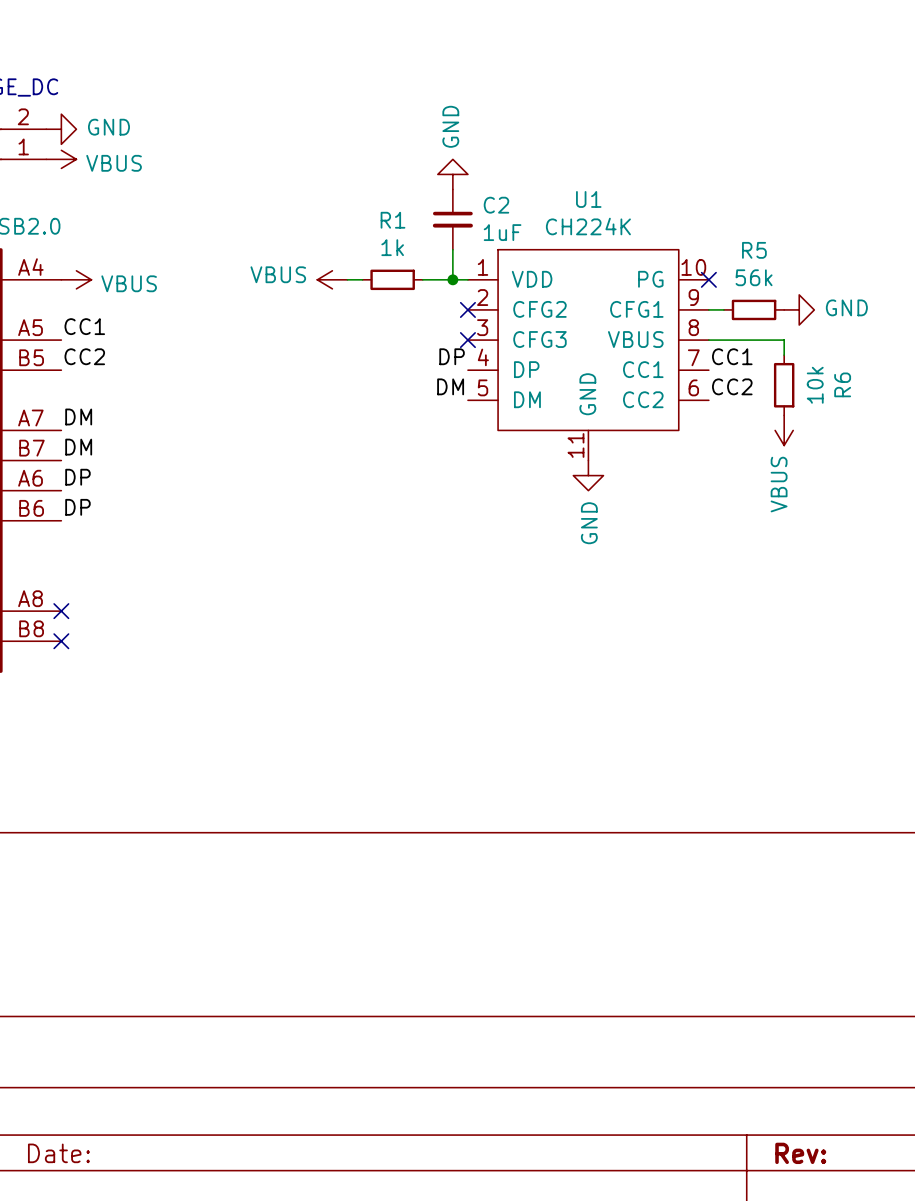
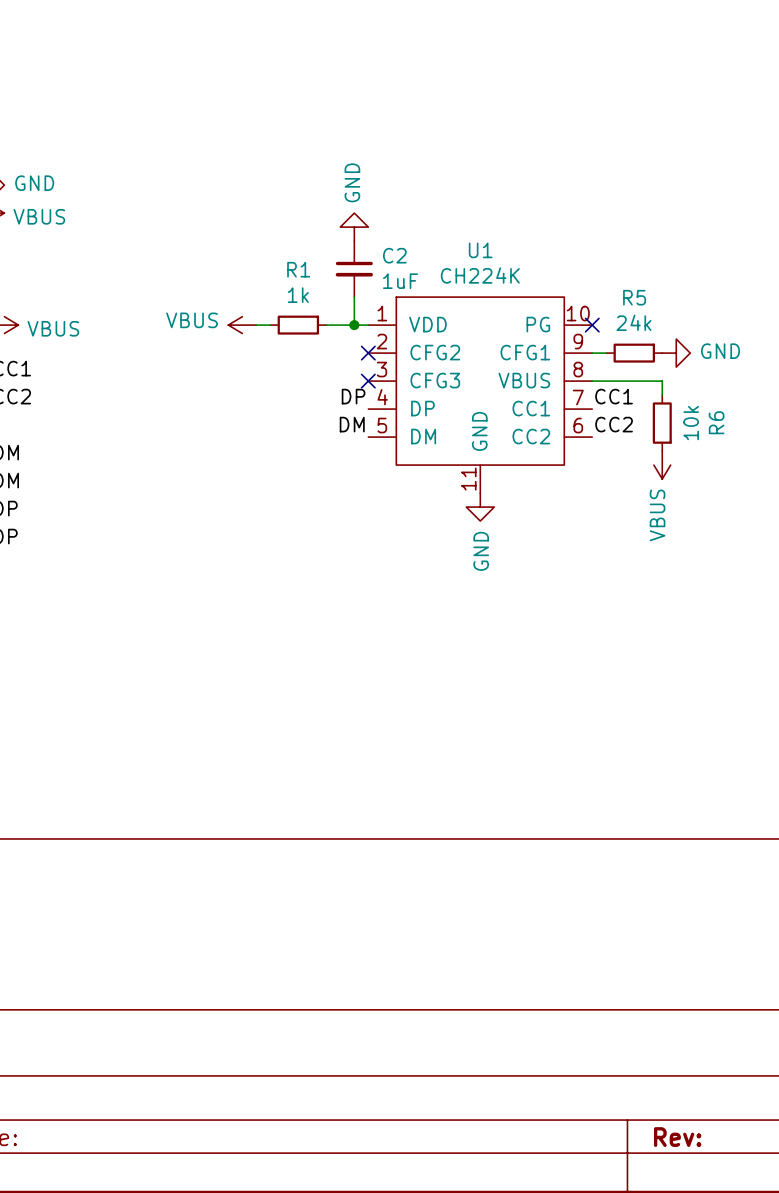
R5 value: 56k (754, 277) -> 24k (633, 322)

